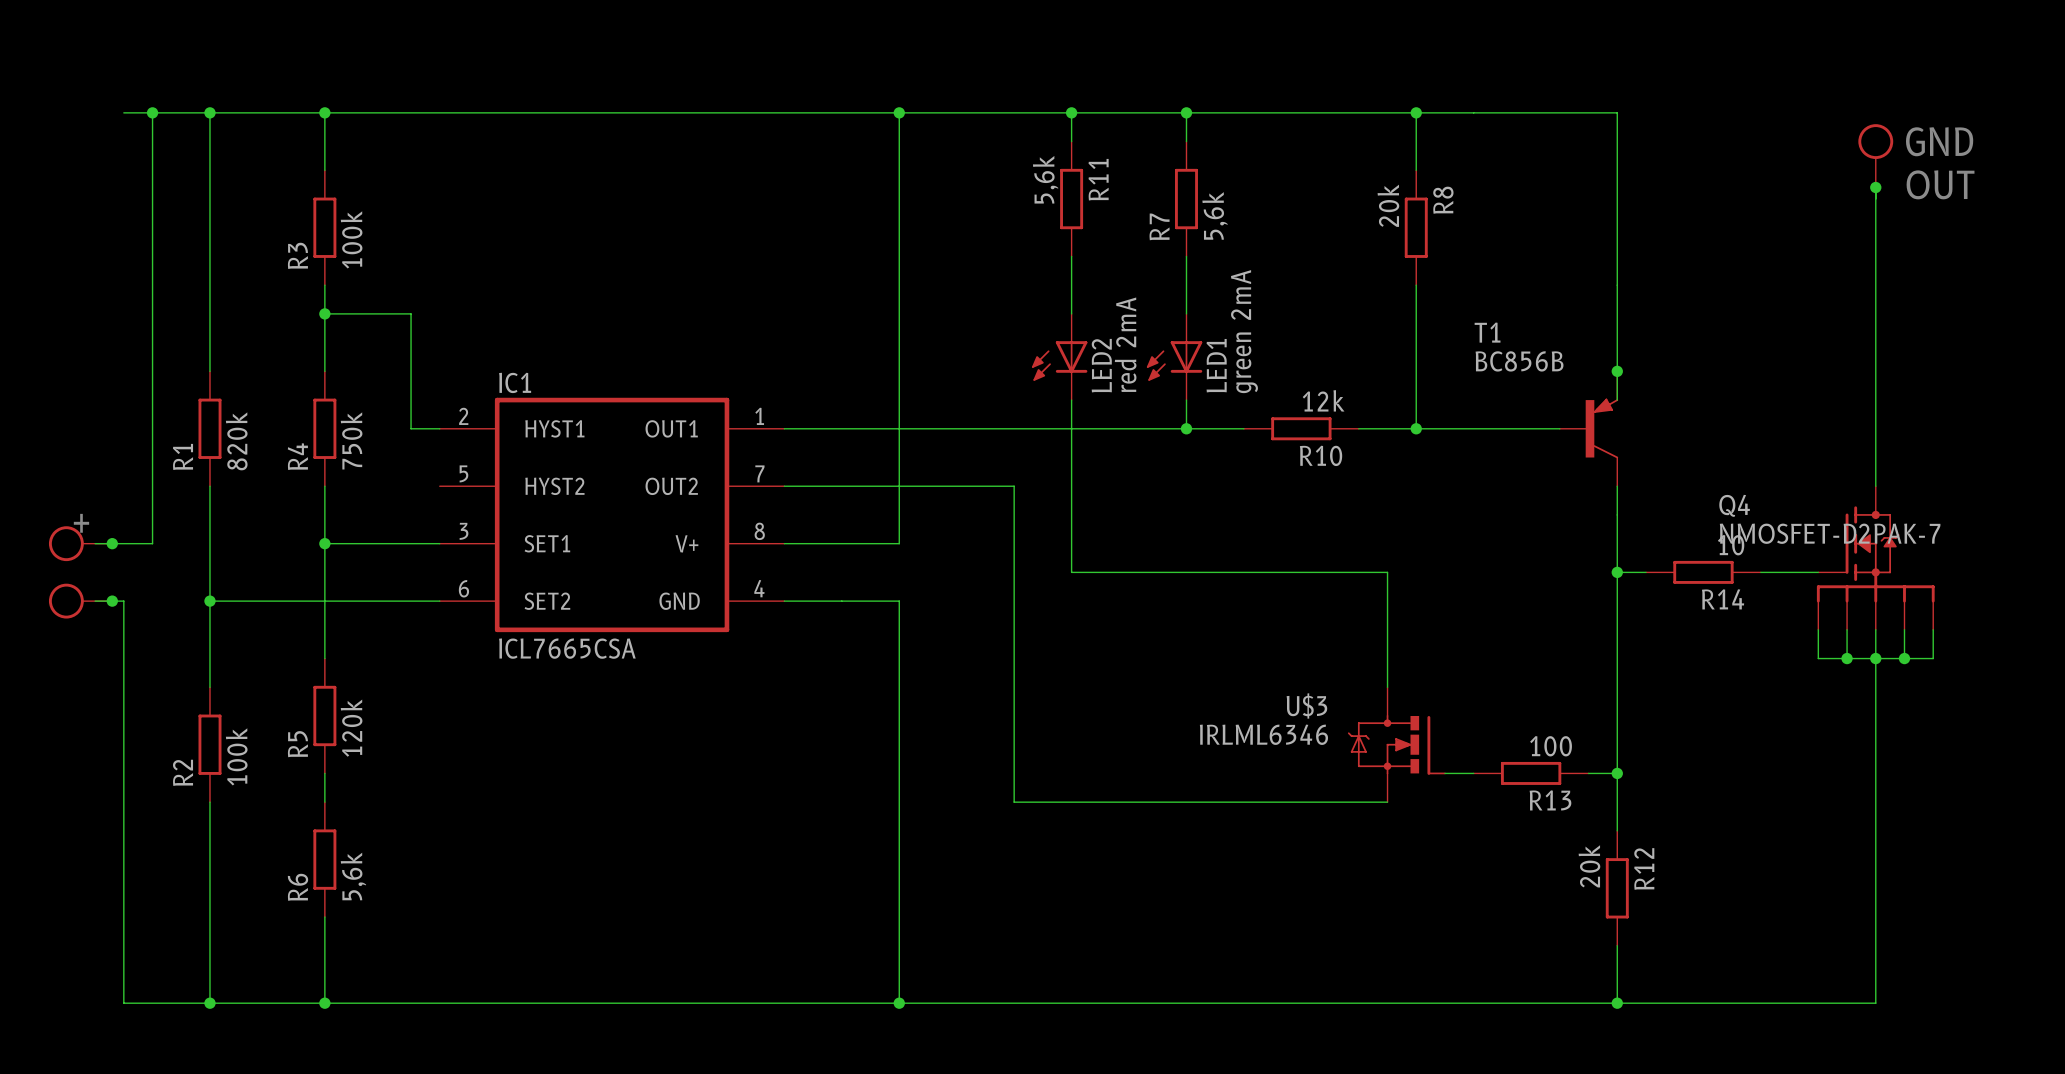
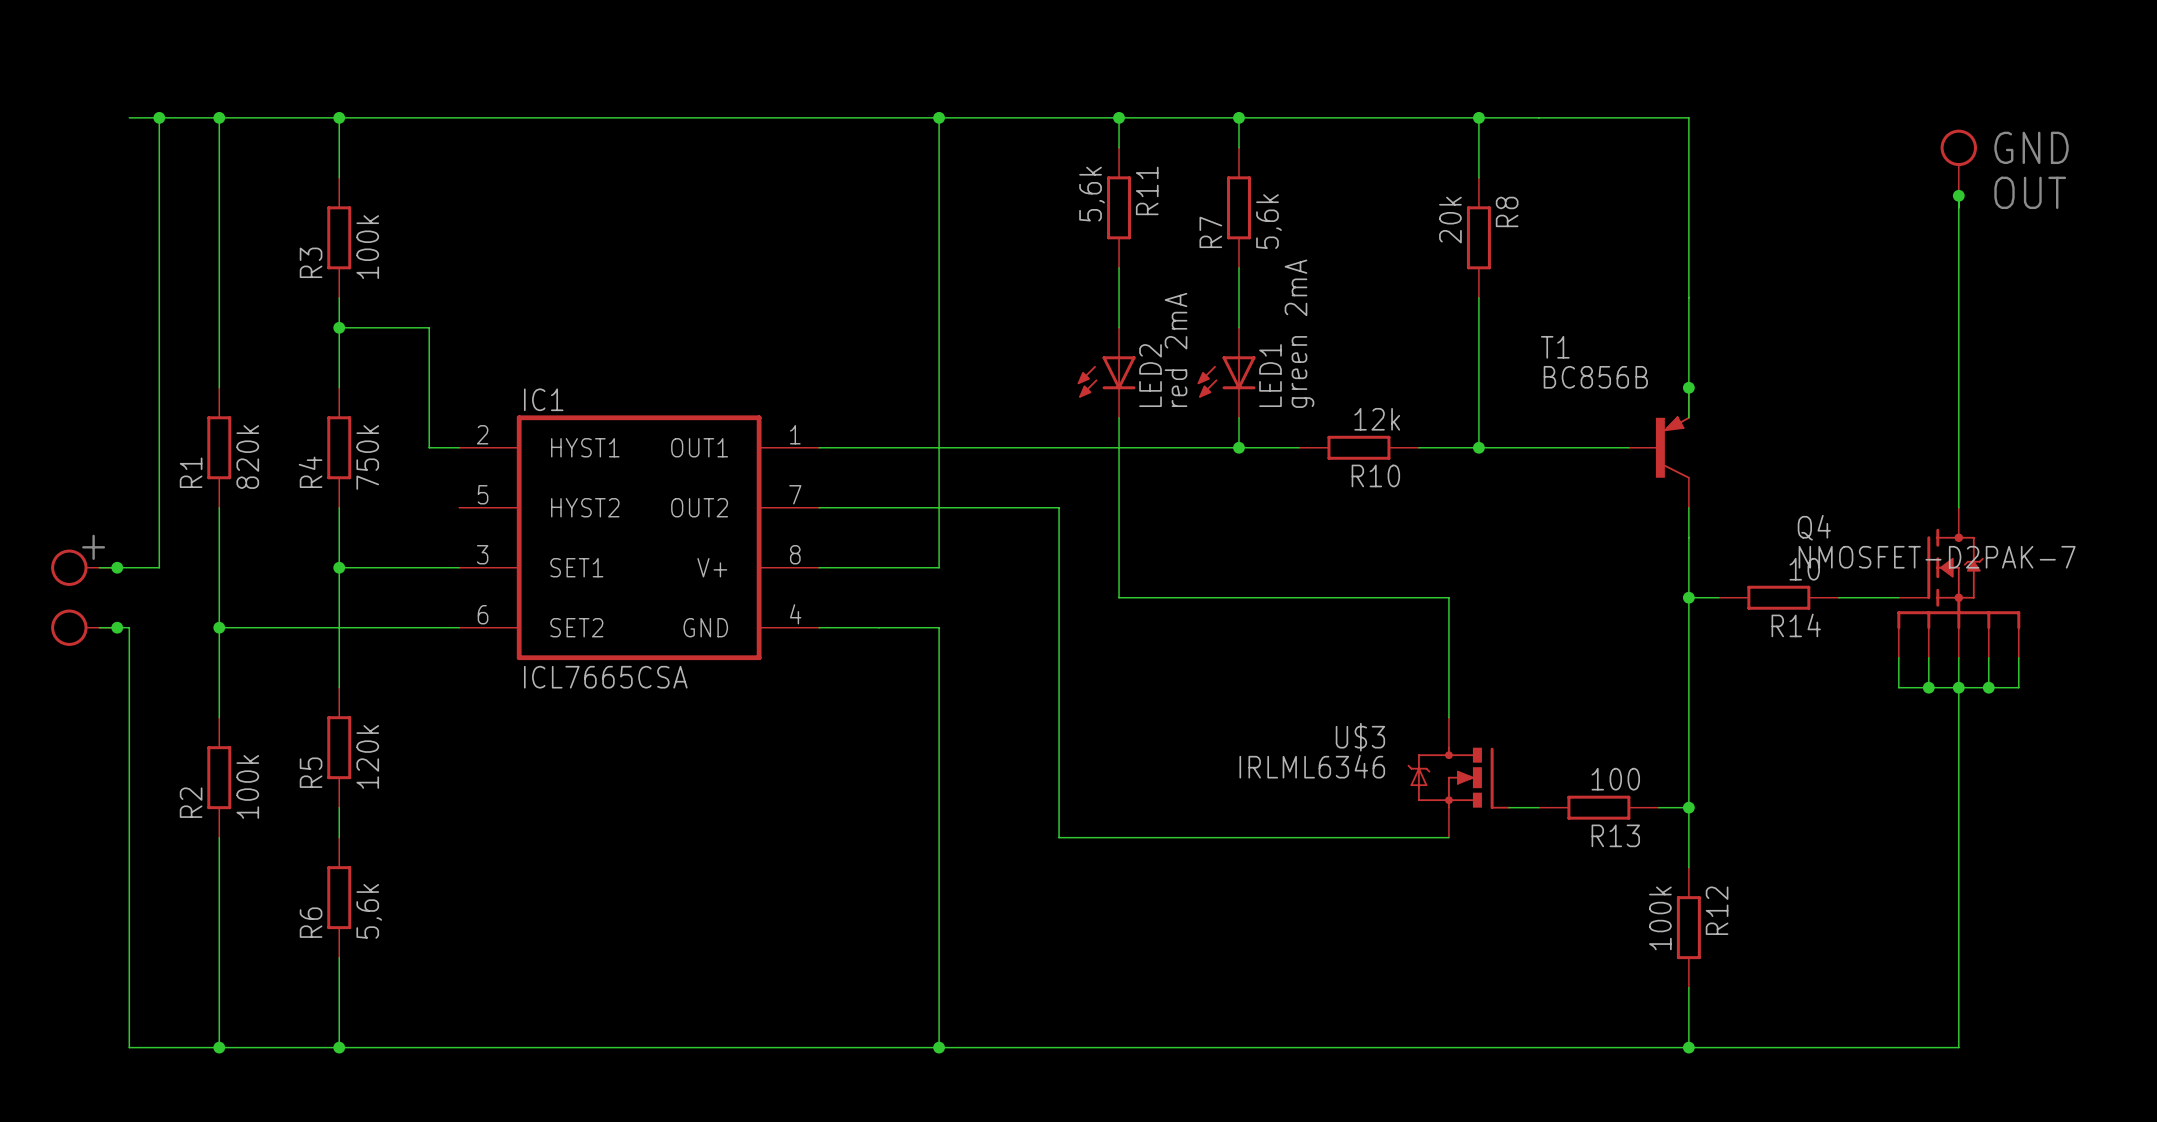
R12 value: 20k (1589, 866) -> 100k (1660, 918)

